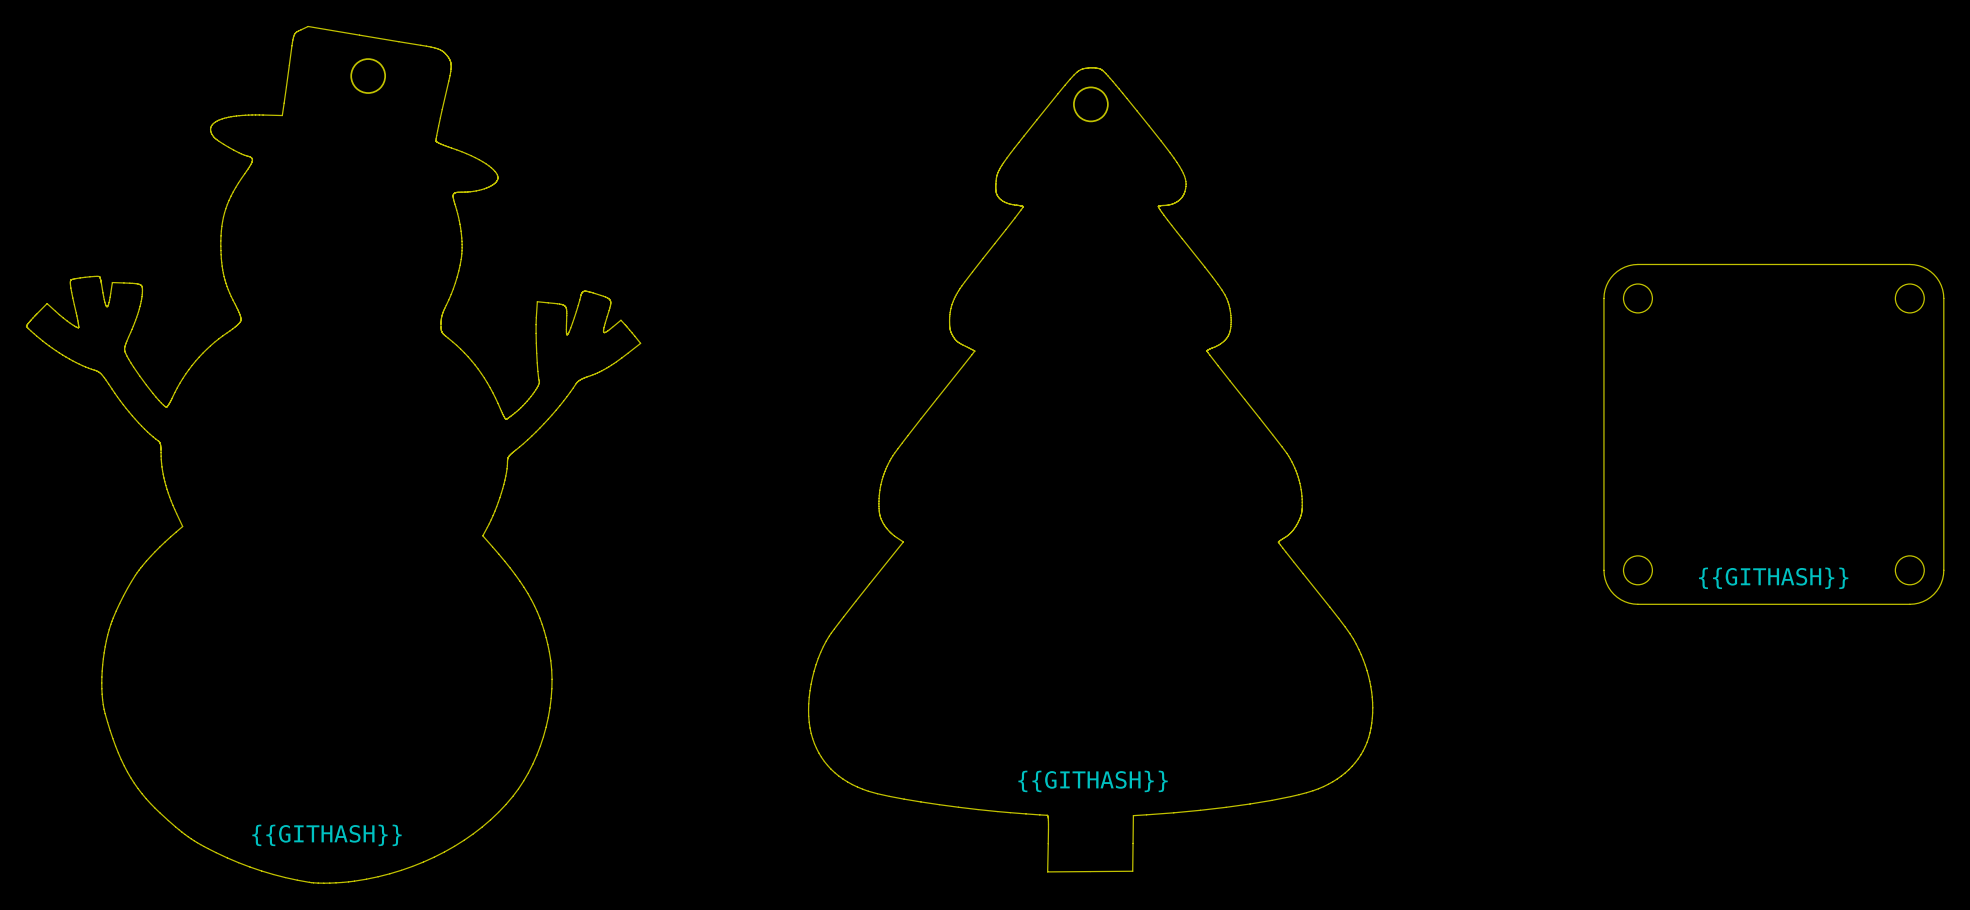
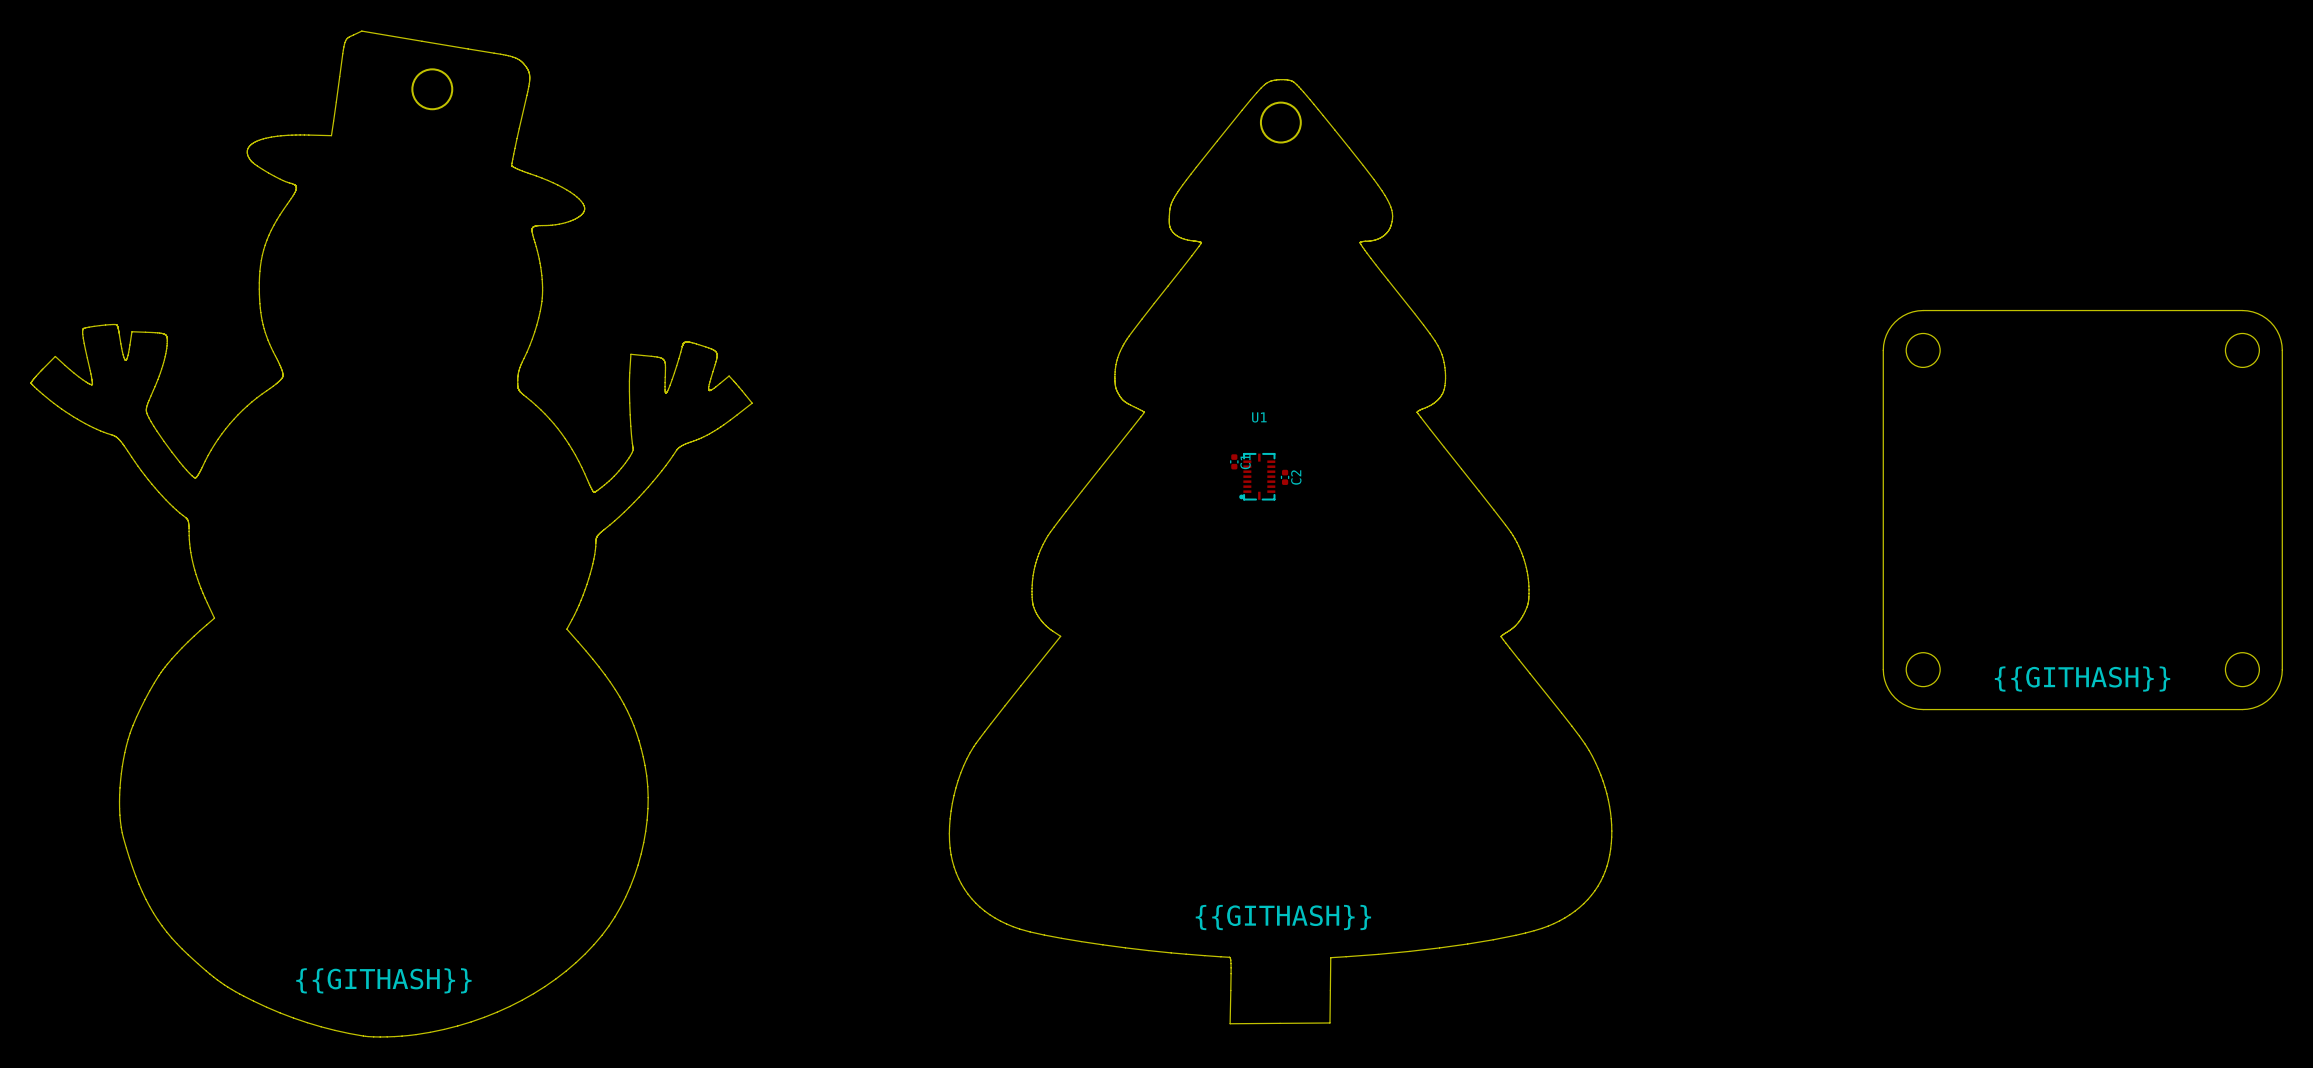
C1: none -> (1234, 461)
U1: none -> (1257, 476)
C2: none -> (1285, 477)

